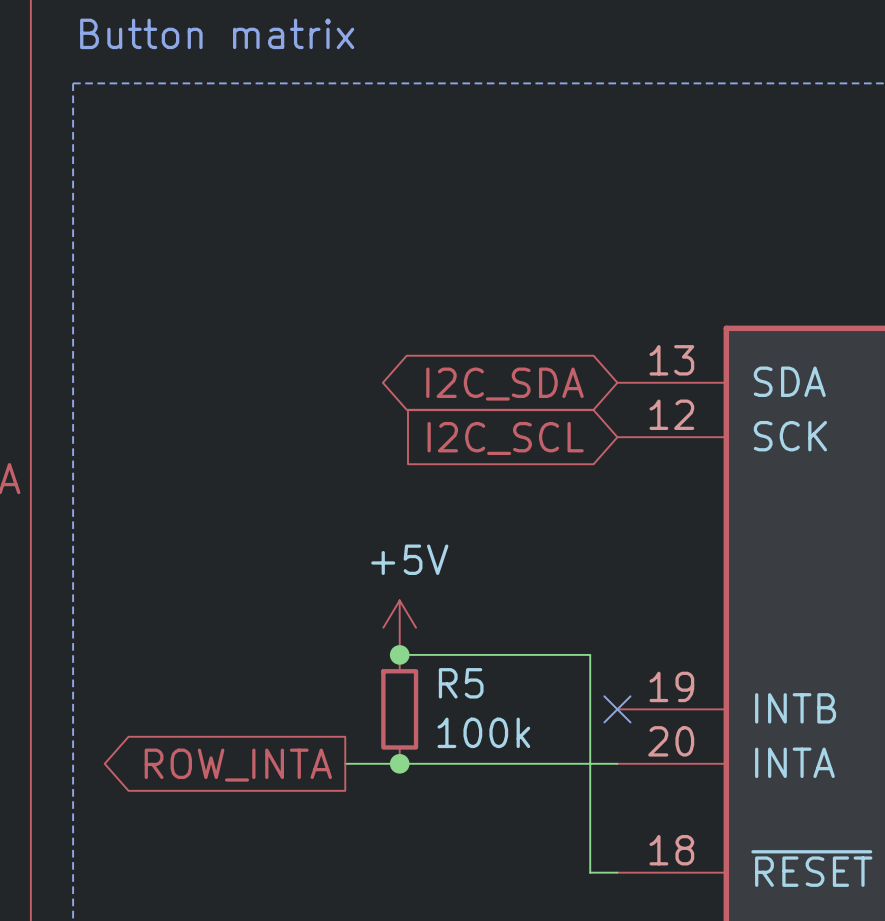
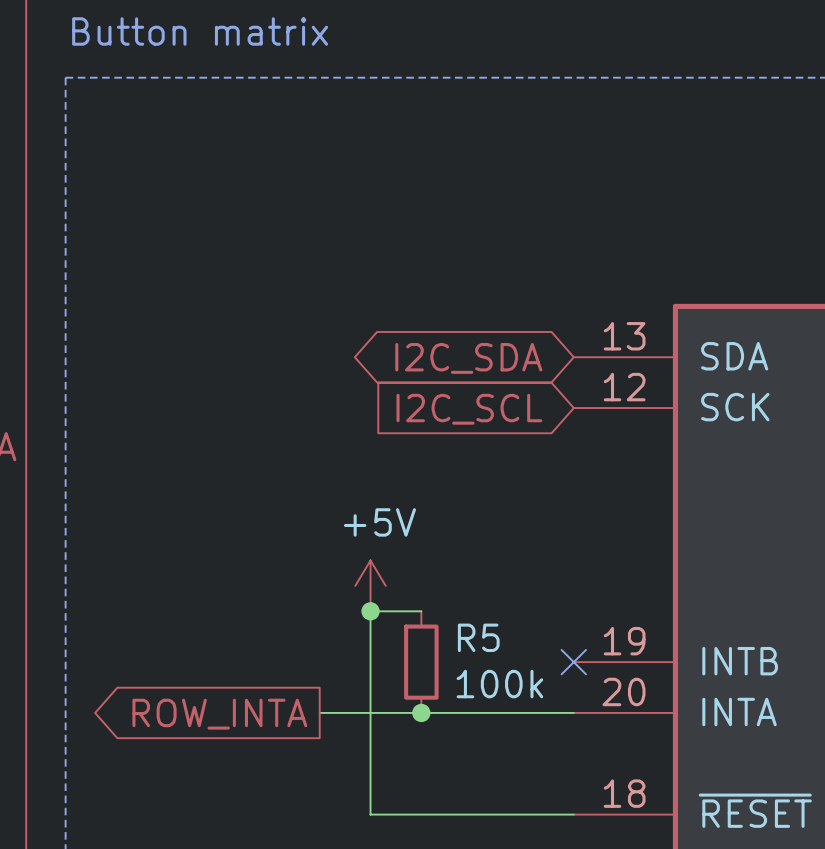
wire: (454, 654) (590, 654) (590, 872) -> (370, 611) (370, 814) (548, 814)
R5 position: (399, 709) -> (421, 662)
junction position: (399, 763) -> (421, 712)

